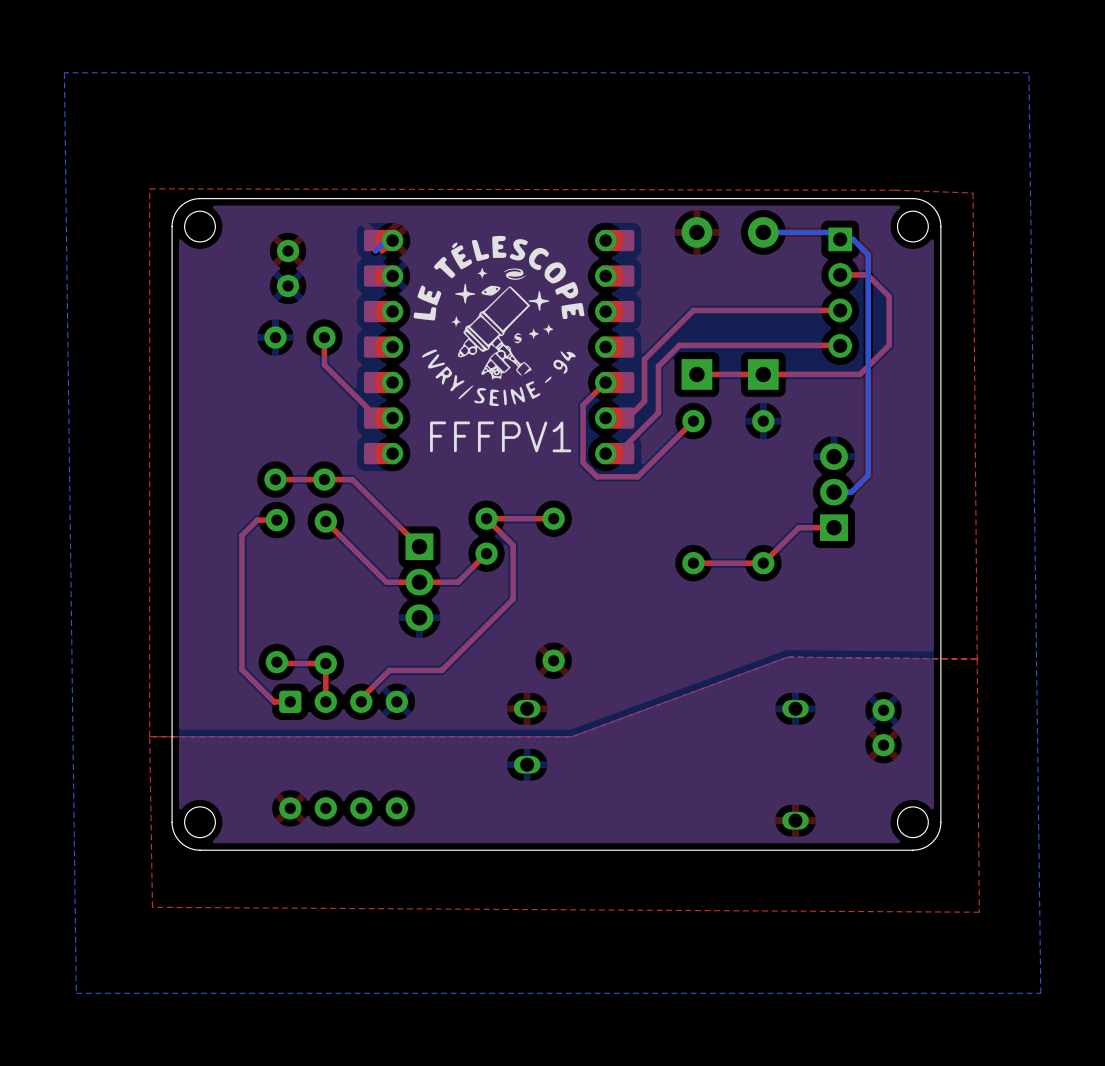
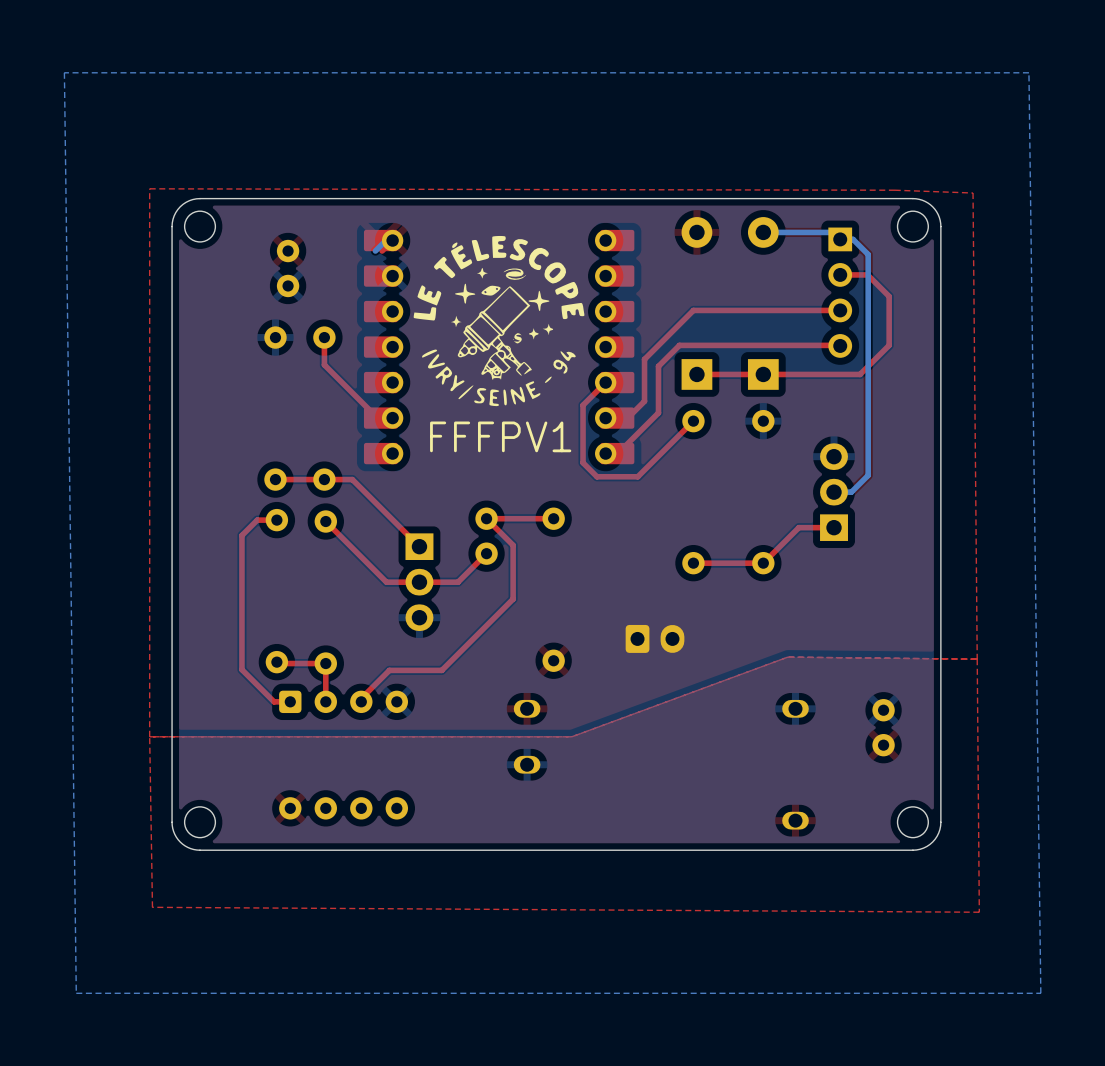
part: none -> (655, 638)

